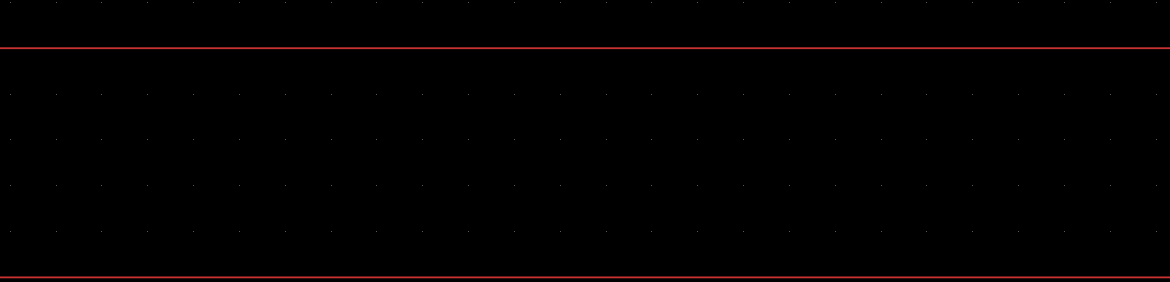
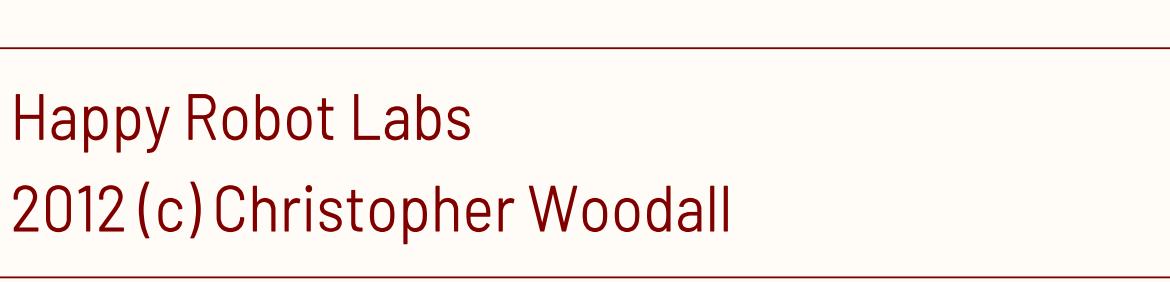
text: none -> Happy Robot Labs (242, 123)
text: none -> 2012 (c) Christopher Woodall (370, 212)

